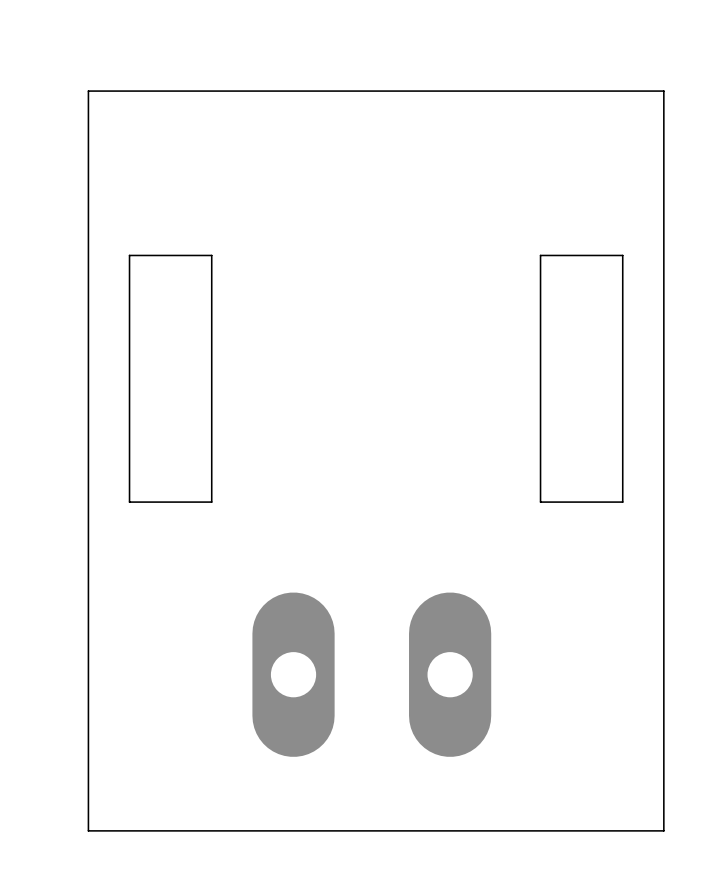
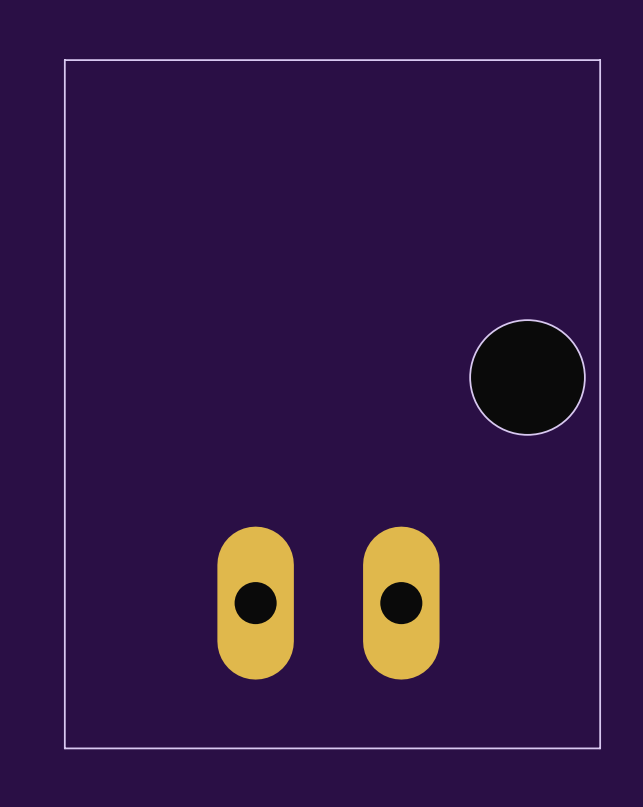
board edge: (211, 255) (129, 255) (129, 502) (211, 502) (211, 255) -> none
board edge: (622, 255) (540, 255) (540, 502) (622, 502) (622, 255) -> none
hole: none -> (527, 377)

